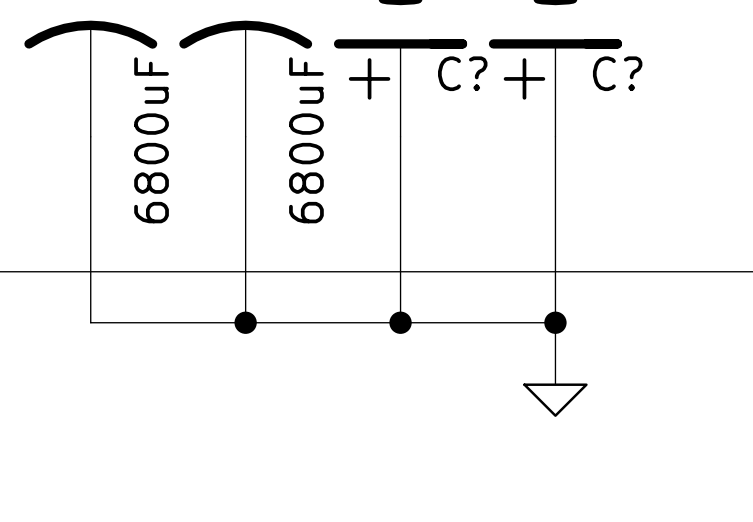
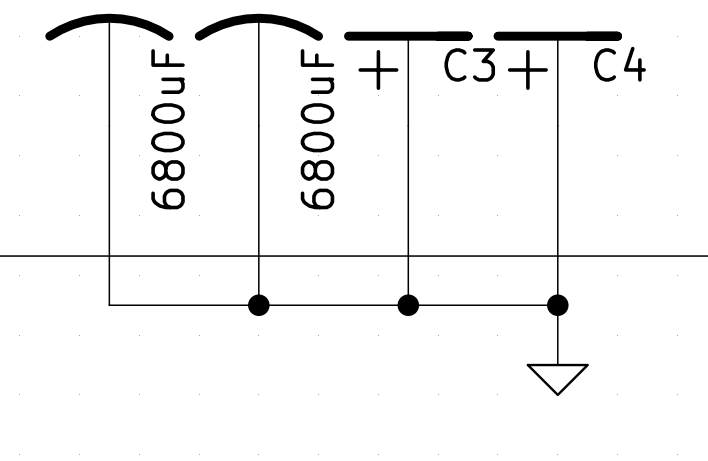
C? name: C? (462, 73) -> C3 (469, 64)
C? name: C? (617, 73) -> C4 (619, 64)

